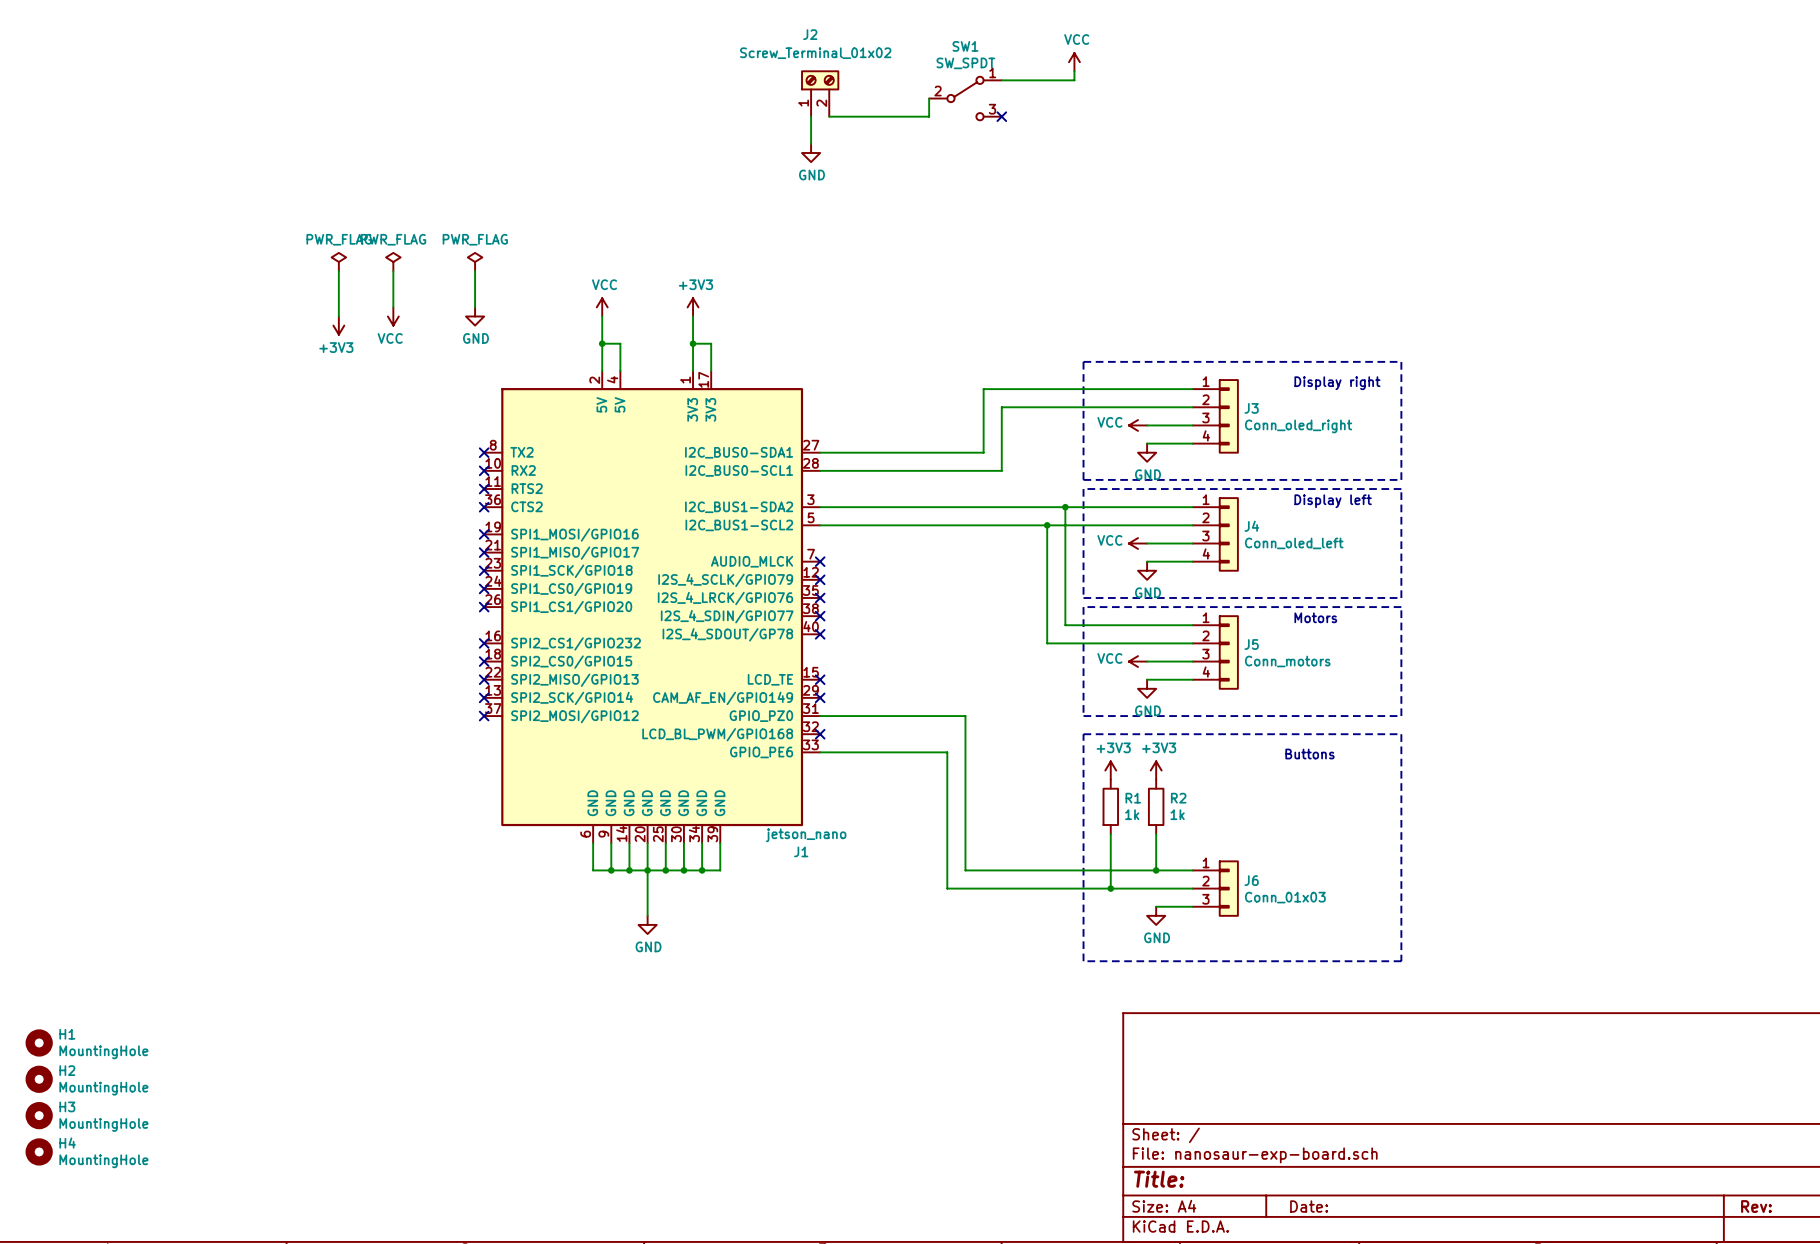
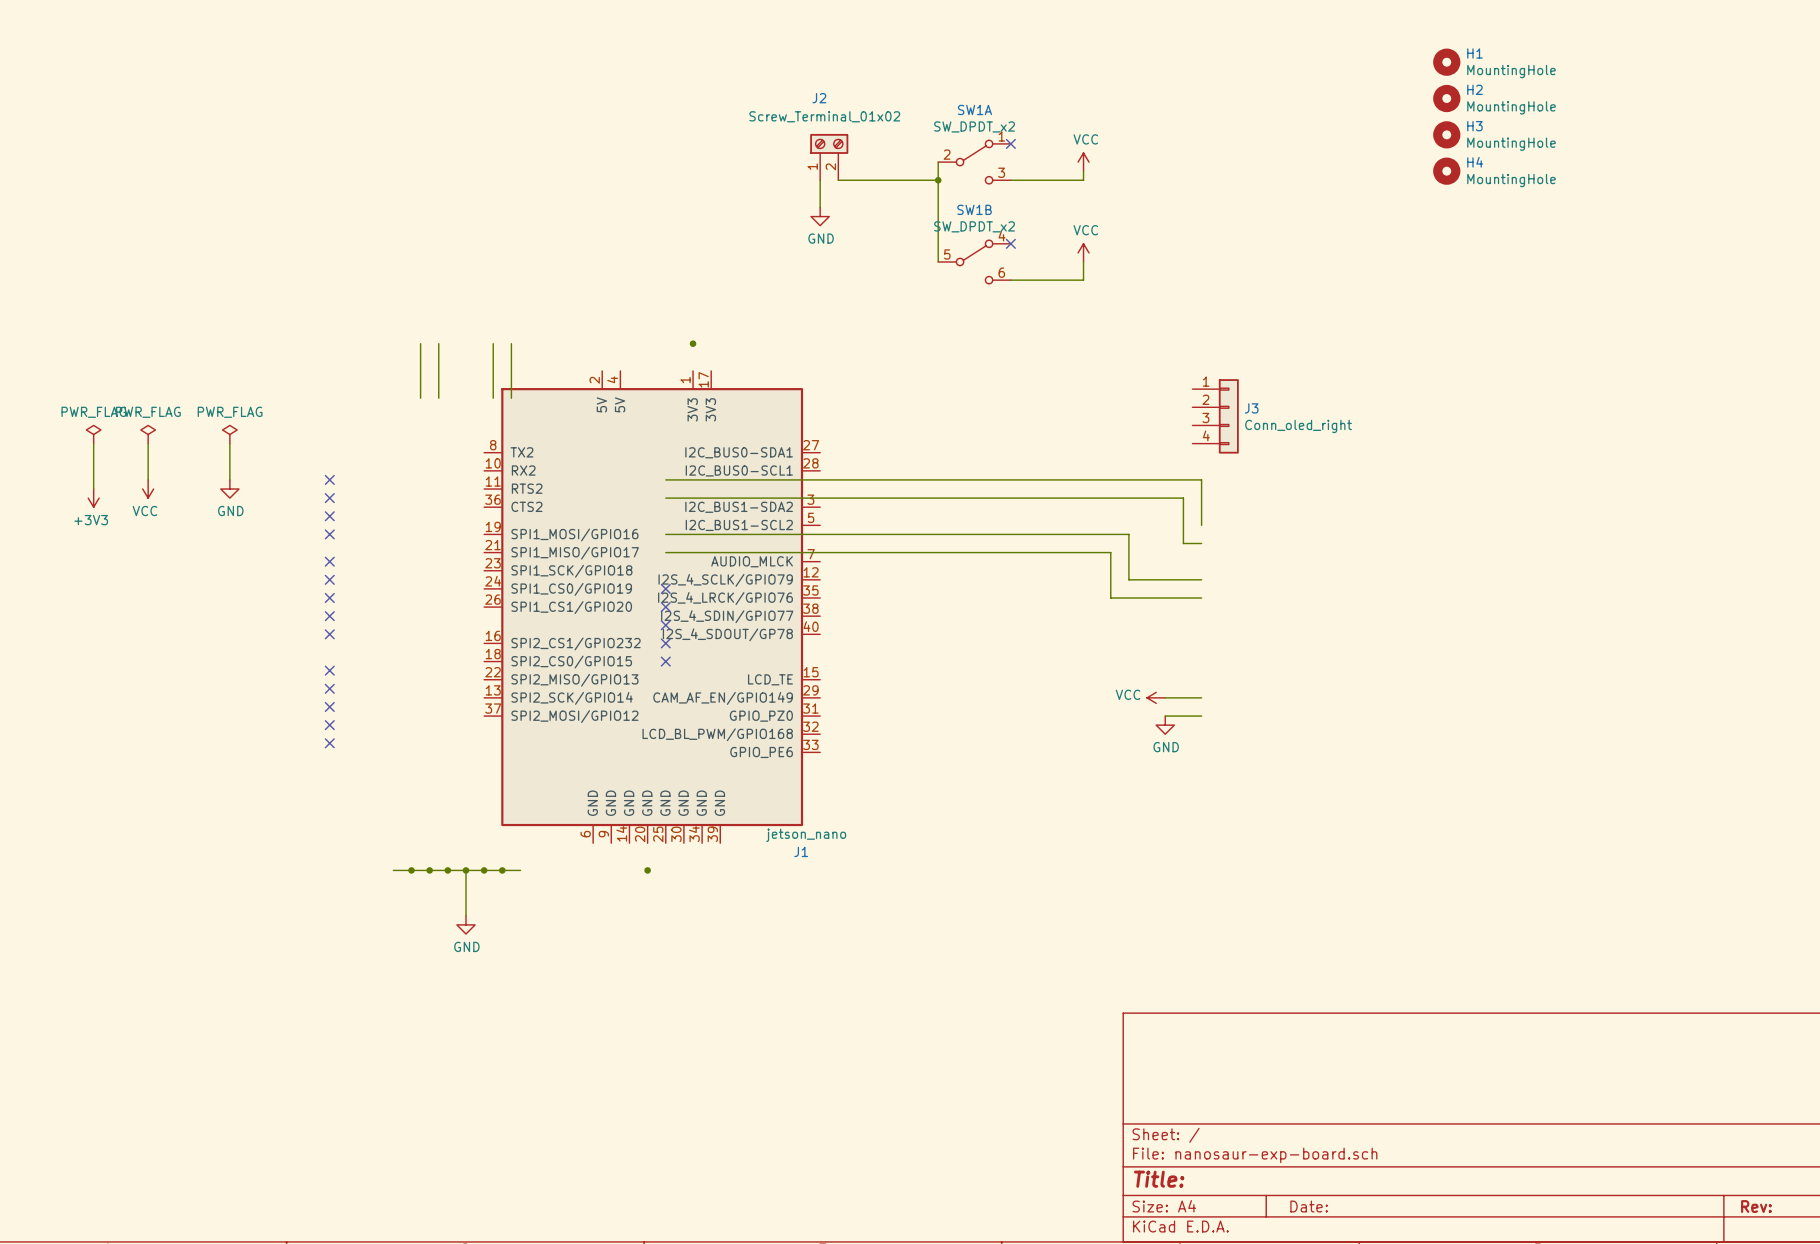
power symbol: VCC (1074, 62) -> none
wire: (1074, 71) (1074, 80) (1001, 80) -> (1083, 171) (1083, 180) (1010, 180)
J2 position: (820, 93) -> (829, 157)
wire: (929, 98) (929, 116) (829, 116) -> none
SW1: SW_SPDT (965, 98) -> none
wire: (811, 116) (811, 143) -> (820, 180) (820, 207)
no-connect mark position: (1001, 116) -> (1010, 143)
power symbol position: GND (811, 153) -> GND (820, 216)
wire: none -> (938, 162) (938, 261)
SW1A: none -> SW_DPDT_x2 (974, 162)
power symbol: none -> VCC (1083, 162)
wire: none -> (838, 180) (938, 180)
junction: none -> (938, 180)
no-connect mark: none -> (1010, 243)
power symbol: none -> VCC (1083, 252)
power symbol: PWR_FLAG (338, 261) -> none
power symbol: PWR_FLAG (393, 261) -> none
power symbol: PWR_FLAG (475, 261) -> none
SW1B: none -> SW_DPDT_x2 (974, 261)
wire: none -> (1083, 261) (1083, 280) (1010, 280)
wire: (338, 271) (338, 316) -> none
wire: (393, 271) (393, 307) -> none
wire: (475, 271) (475, 307) -> none
power symbol: VCC (602, 307) -> none
power symbol: +3V3 (693, 307) -> none
power symbol: VCC (393, 316) -> none
power symbol: GND (475, 316) -> none
wire: (602, 316) (602, 370) -> (511, 343) (511, 398)
wire: (693, 316) (693, 370) -> none
power symbol: +3V3 (338, 325) -> none
wire: none -> (420, 343) (420, 398)
wire: none -> (438, 343) (438, 398)
wire: none -> (493, 343) (493, 398)
wire: (602, 343) (620, 343) (620, 370) -> none
junction: (602, 343) -> none
wire: (693, 343) (711, 343) (711, 370) -> none
line: (1083, 361) (1401, 361) (1401, 479) (1083, 479) (1083, 361) -> none
text: Display right (1337, 383) -> none
wire: (1192, 389) (983, 389) (983, 452) (820, 452) -> none
wire: (1192, 407) (1001, 407) (1001, 470) (820, 470) -> none
power symbol: VCC (1138, 425) -> none
wire: (1147, 425) (1192, 425) -> none
power symbol: none -> PWR_FLAG (93, 434)
power symbol: none -> PWR_FLAG (148, 434)
power symbol: none -> PWR_FLAG (229, 434)
wire: none -> (93, 443) (93, 489)
wire: none -> (148, 443) (148, 479)
wire: none -> (229, 443) (229, 479)
wire: (1147, 443) (1192, 443) -> none
no-connect mark: (484, 452) -> none
power symbol: GND (1147, 452) -> none
no-connect mark: (484, 470) -> none
no-connect mark: none -> (329, 479)
wire: none -> (665, 479) (1201, 479) (1201, 525)
power symbol: none -> VCC (148, 489)
power symbol: none -> GND (229, 489)
no-connect mark: (484, 489) -> none
line: (1083, 489) (1083, 597) (1401, 597) (1401, 489) (1083, 489) -> none
power symbol: none -> +3V3 (93, 498)
no-connect mark: none -> (329, 498)
text: Display left (1333, 501) -> none
no-connect mark: (484, 507) -> none
wire: (820, 507) (1192, 507) -> none
wire: (1065, 507) (1065, 625) (1192, 625) -> none
junction: (1065, 507) -> none
no-connect mark: none -> (329, 516)
wire: (820, 525) (1192, 525) -> none
wire: (1047, 525) (1047, 643) (1192, 643) -> none
junction: (1047, 525) -> none
no-connect mark: none -> (329, 534)
no-connect mark: (484, 534) -> none
wire: none -> (665, 534) (1128, 534) (1128, 579) (1201, 579)
J4: Conn_oled_left (1215, 534) -> none
power symbol: VCC (1138, 543) -> none
wire: (1147, 543) (1183, 543) -> (665, 498) (1183, 498) (1183, 543)
no-connect mark: (484, 552) -> none
wire: none -> (665, 552) (1110, 552) (1110, 597) (1201, 597)
no-connect mark: none -> (329, 561)
no-connect mark: (820, 561) -> none
wire: (1147, 561) (1192, 561) -> none
no-connect mark: (484, 570) -> none
power symbol: GND (1147, 570) -> none
no-connect mark: none -> (329, 579)
no-connect mark: (820, 579) -> none
no-connect mark: (484, 588) -> none
no-connect mark: none -> (665, 588)
no-connect mark: none -> (329, 597)
no-connect mark: (820, 597) -> none
no-connect mark: (484, 607) -> none
no-connect mark: none -> (665, 607)
line: (1083, 607) (1083, 716) (1401, 716) (1401, 607) (1083, 607) -> none
no-connect mark: none -> (329, 616)
no-connect mark: (820, 616) -> none
text: Motors (1315, 617) -> none
no-connect mark: none -> (665, 625)
no-connect mark: none -> (329, 634)
no-connect mark: (820, 634) -> none
no-connect mark: (484, 643) -> none
no-connect mark: none -> (665, 643)
J5: Conn_motors (1215, 652) -> none
no-connect mark: (484, 661) -> none
no-connect mark: none -> (665, 661)
power symbol position: VCC (1138, 661) -> VCC (1156, 697)
wire: (1147, 661) (1192, 661) -> none
no-connect mark: none -> (329, 670)
no-connect mark: (484, 679) -> none
no-connect mark: (820, 679) -> none
wire: (1147, 679) (1192, 679) -> none
no-connect mark: none -> (329, 688)
power symbol position: GND (1147, 688) -> GND (1165, 725)
no-connect mark: (484, 697) -> none
no-connect mark: (820, 697) -> none
wire: none -> (1165, 697) (1201, 697)
no-connect mark: none -> (329, 706)
no-connect mark: (484, 716) -> none
wire: (820, 716) (965, 716) (965, 870) (1192, 870) -> none
no-connect mark: none -> (329, 725)
no-connect mark: (820, 734) -> none
line: (1083, 734) (1083, 961) (1401, 961) (1401, 734) (1083, 734) -> none
no-connect mark: none -> (329, 743)
wire: (820, 752) (947, 752) (947, 888) (1192, 888) -> none
text: Buttons (1309, 754) -> none
power symbol: +3V3 (1110, 770) -> none
power symbol: +3V3 (1156, 770) -> none
R1: 1k (1110, 806) -> none
R2: 1k (1156, 806) -> none
wire: (1110, 834) (1110, 888) -> none
wire: (1156, 834) (1156, 870) -> none
wire: (593, 843) (593, 870) (720, 870) (720, 843) -> none
wire: (611, 843) (611, 870) -> none
wire: (629, 843) (629, 870) -> none
wire: (647, 843) (647, 915) -> none
wire: (665, 843) (665, 870) -> none
wire: (683, 843) (683, 870) -> none
wire: (702, 843) (702, 870) -> none
wire: none -> (393, 870) (520, 870)
junction: none -> (411, 870)
junction: none -> (429, 870)
junction: none -> (447, 870)
wire: none -> (465, 870) (465, 915)
junction: none -> (465, 870)
junction: none -> (484, 870)
junction: none -> (502, 870)
junction: (611, 870) -> none
junction: (629, 870) -> none
junction: (665, 870) -> none
junction: (683, 870) -> none
junction: (702, 870) -> none
junction: (1156, 870) -> none
junction: (1110, 888) -> none
J6: Conn_01x03 (1215, 888) -> none
wire: (1156, 906) (1192, 906) -> none
power symbol: GND (1156, 915) -> none
power symbol: none -> GND (465, 924)
power symbol: GND (647, 924) -> none
H1 position: (39, 1042) -> (1446, 62)
H2 position: (39, 1079) -> (1446, 98)
H3 position: (39, 1115) -> (1446, 134)
H4 position: (39, 1151) -> (1446, 171)

